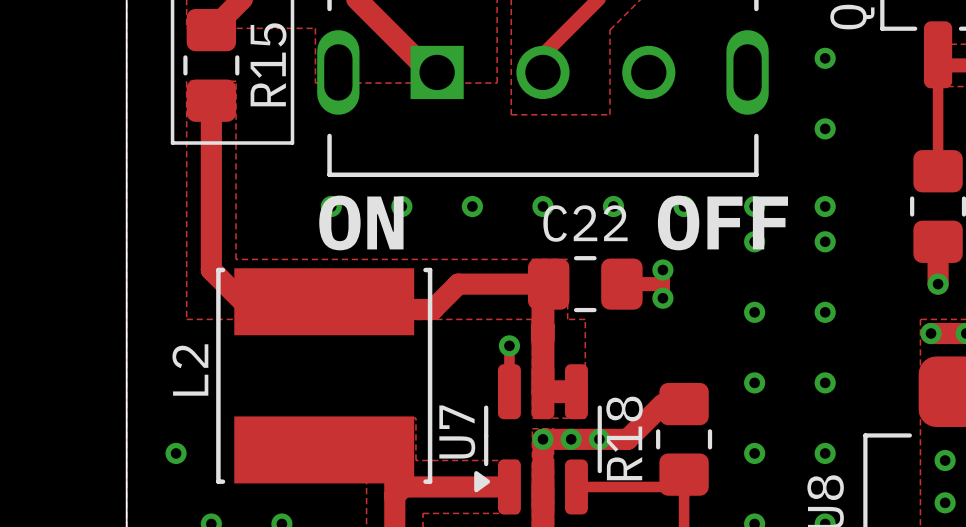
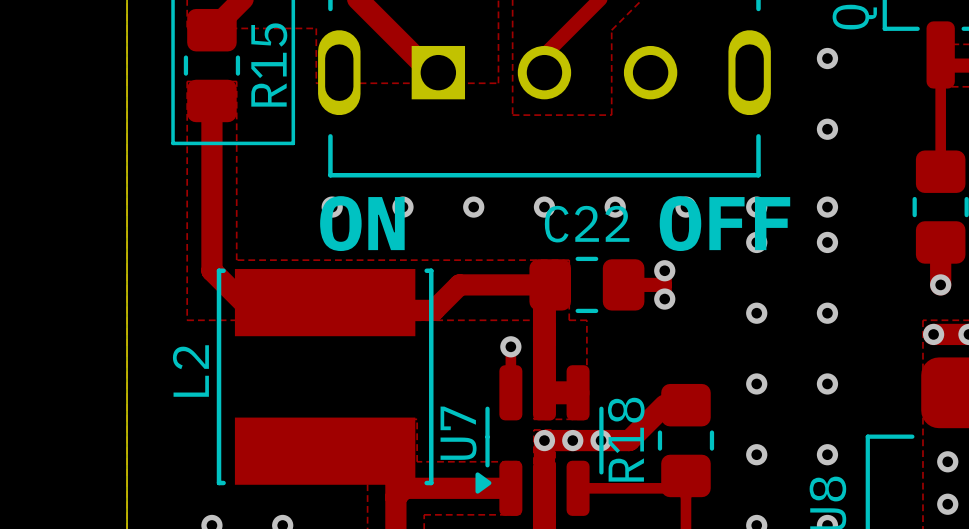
via: (176, 453) -> none

